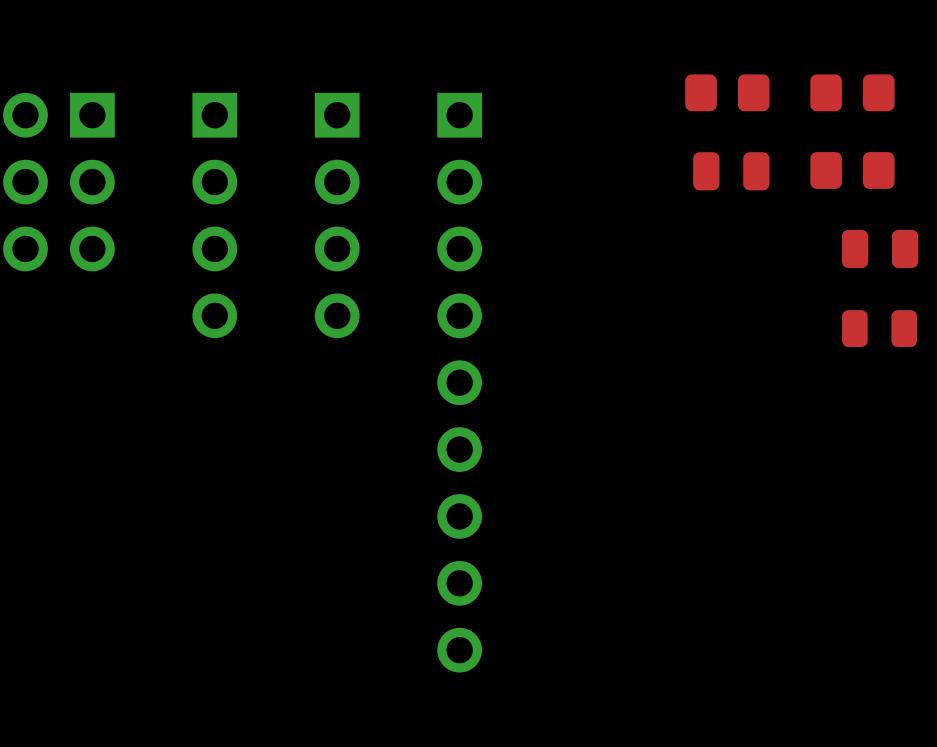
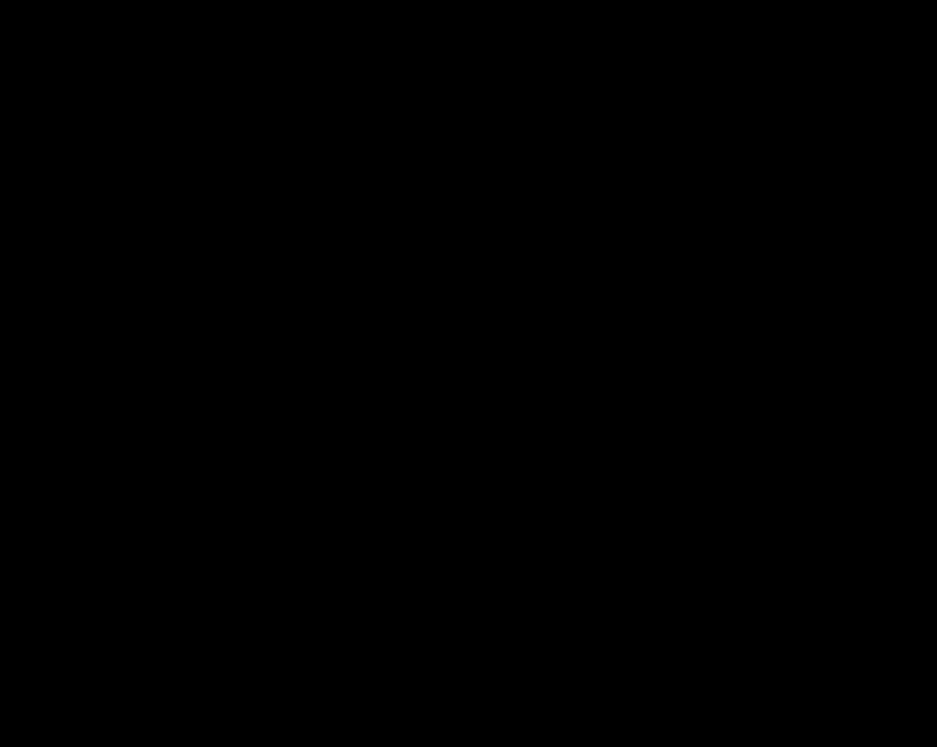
part: (727, 92) -> none
part: (852, 92) -> none
part: (852, 170) -> none
part: (731, 171) -> none
part: (58, 182) -> none
part: (214, 215) -> none
part: (337, 215) -> none
part: (880, 248) -> none
part: (879, 328) -> none
part: (459, 382) -> none

